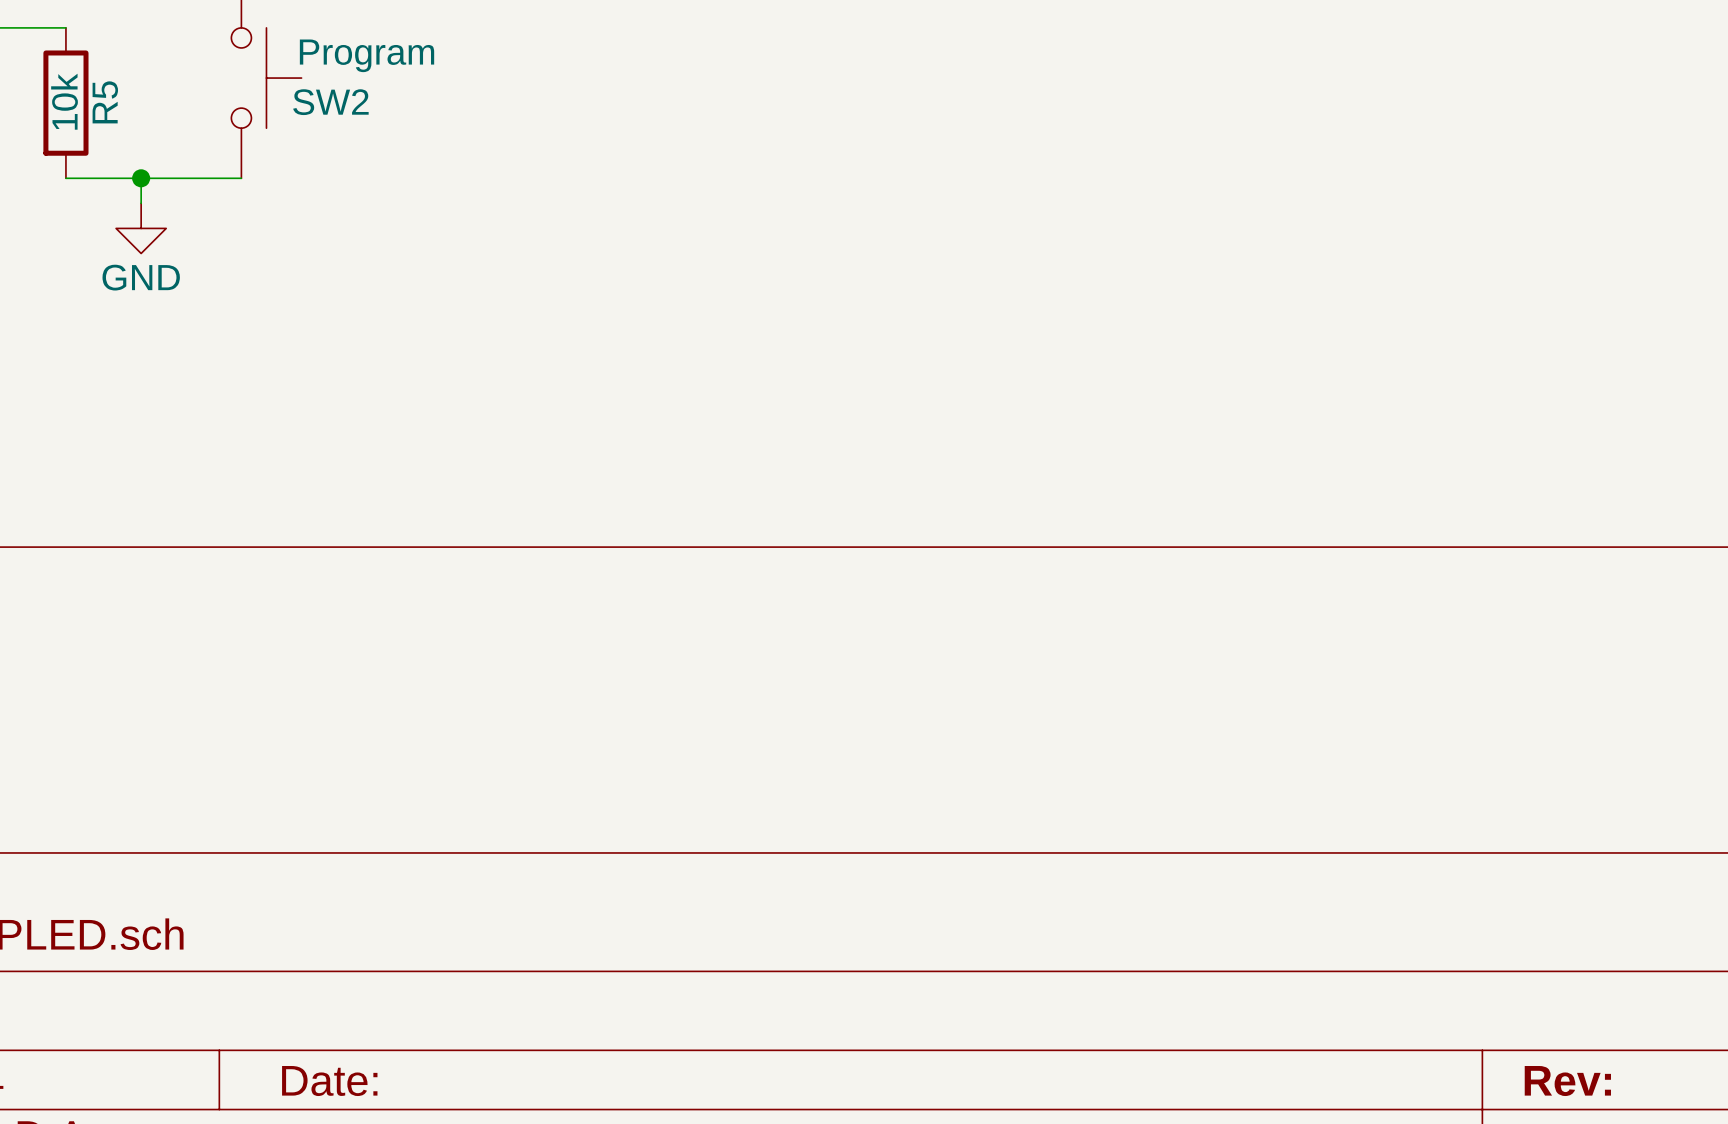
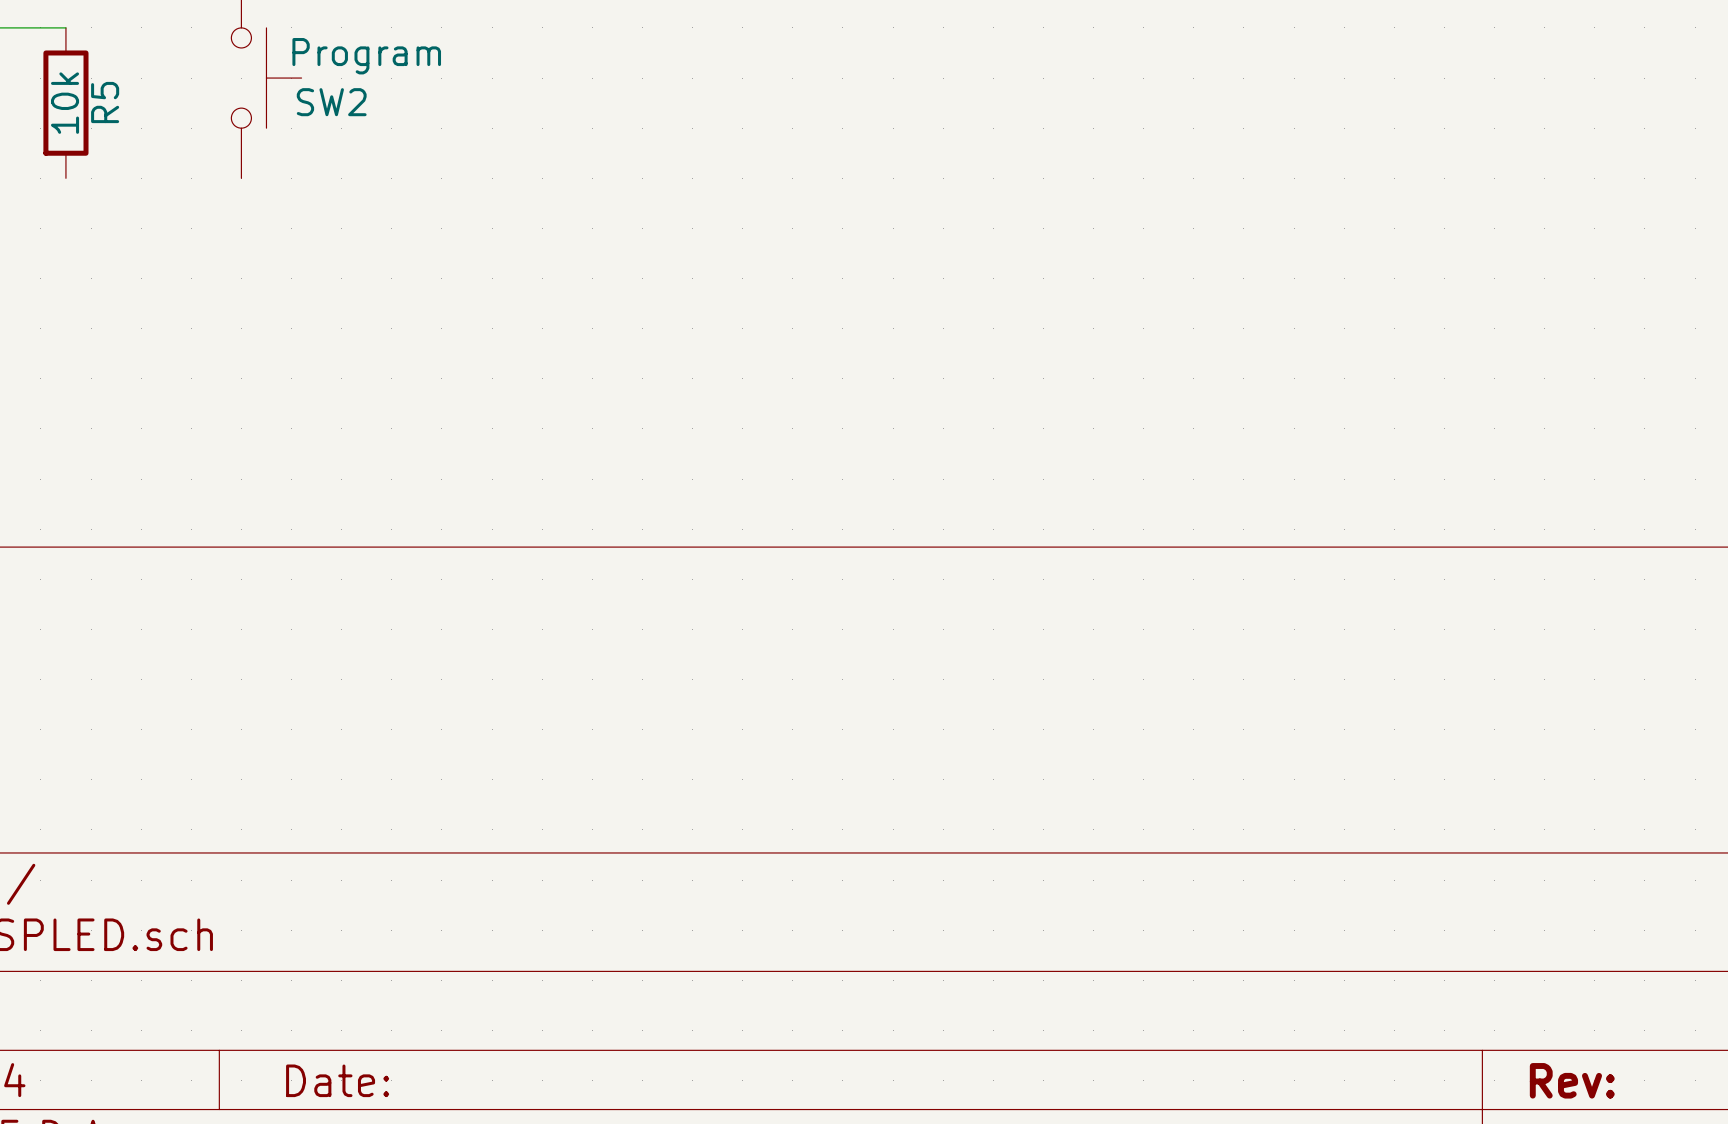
wire: (65, 178) (241, 178) -> none
wire: (141, 178) (141, 203) -> none
junction: (141, 178) -> none
power symbol: GND (141, 228) -> none

